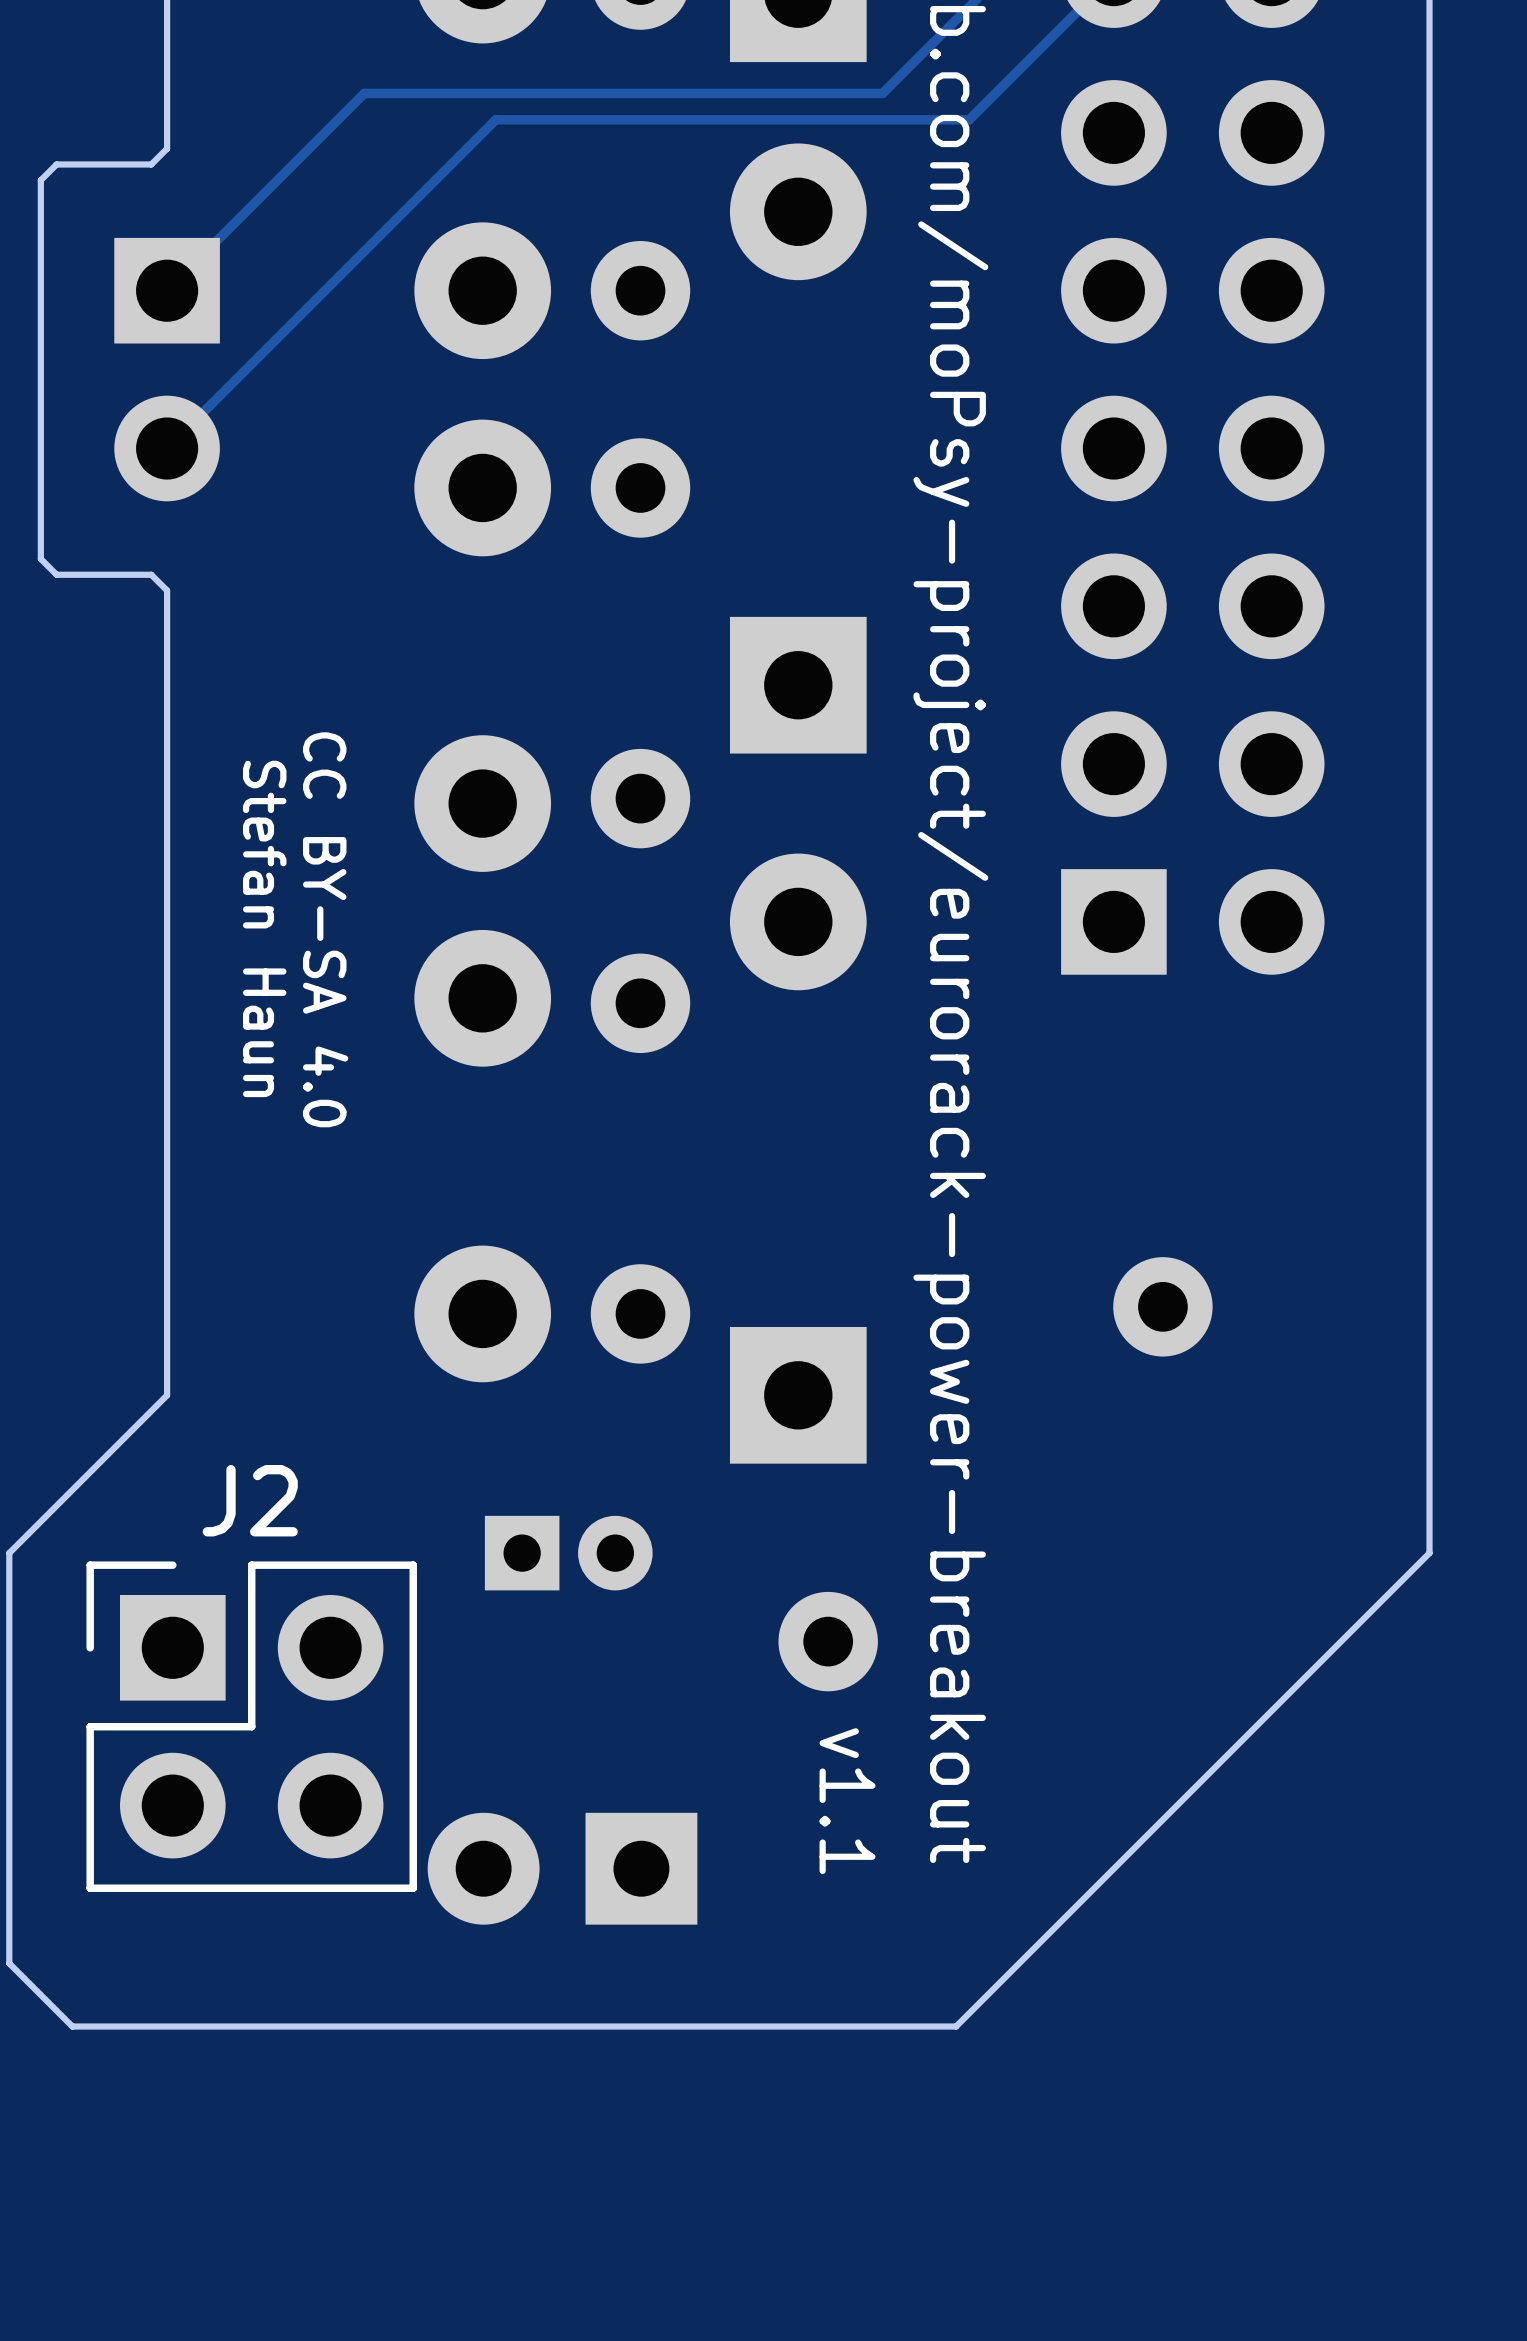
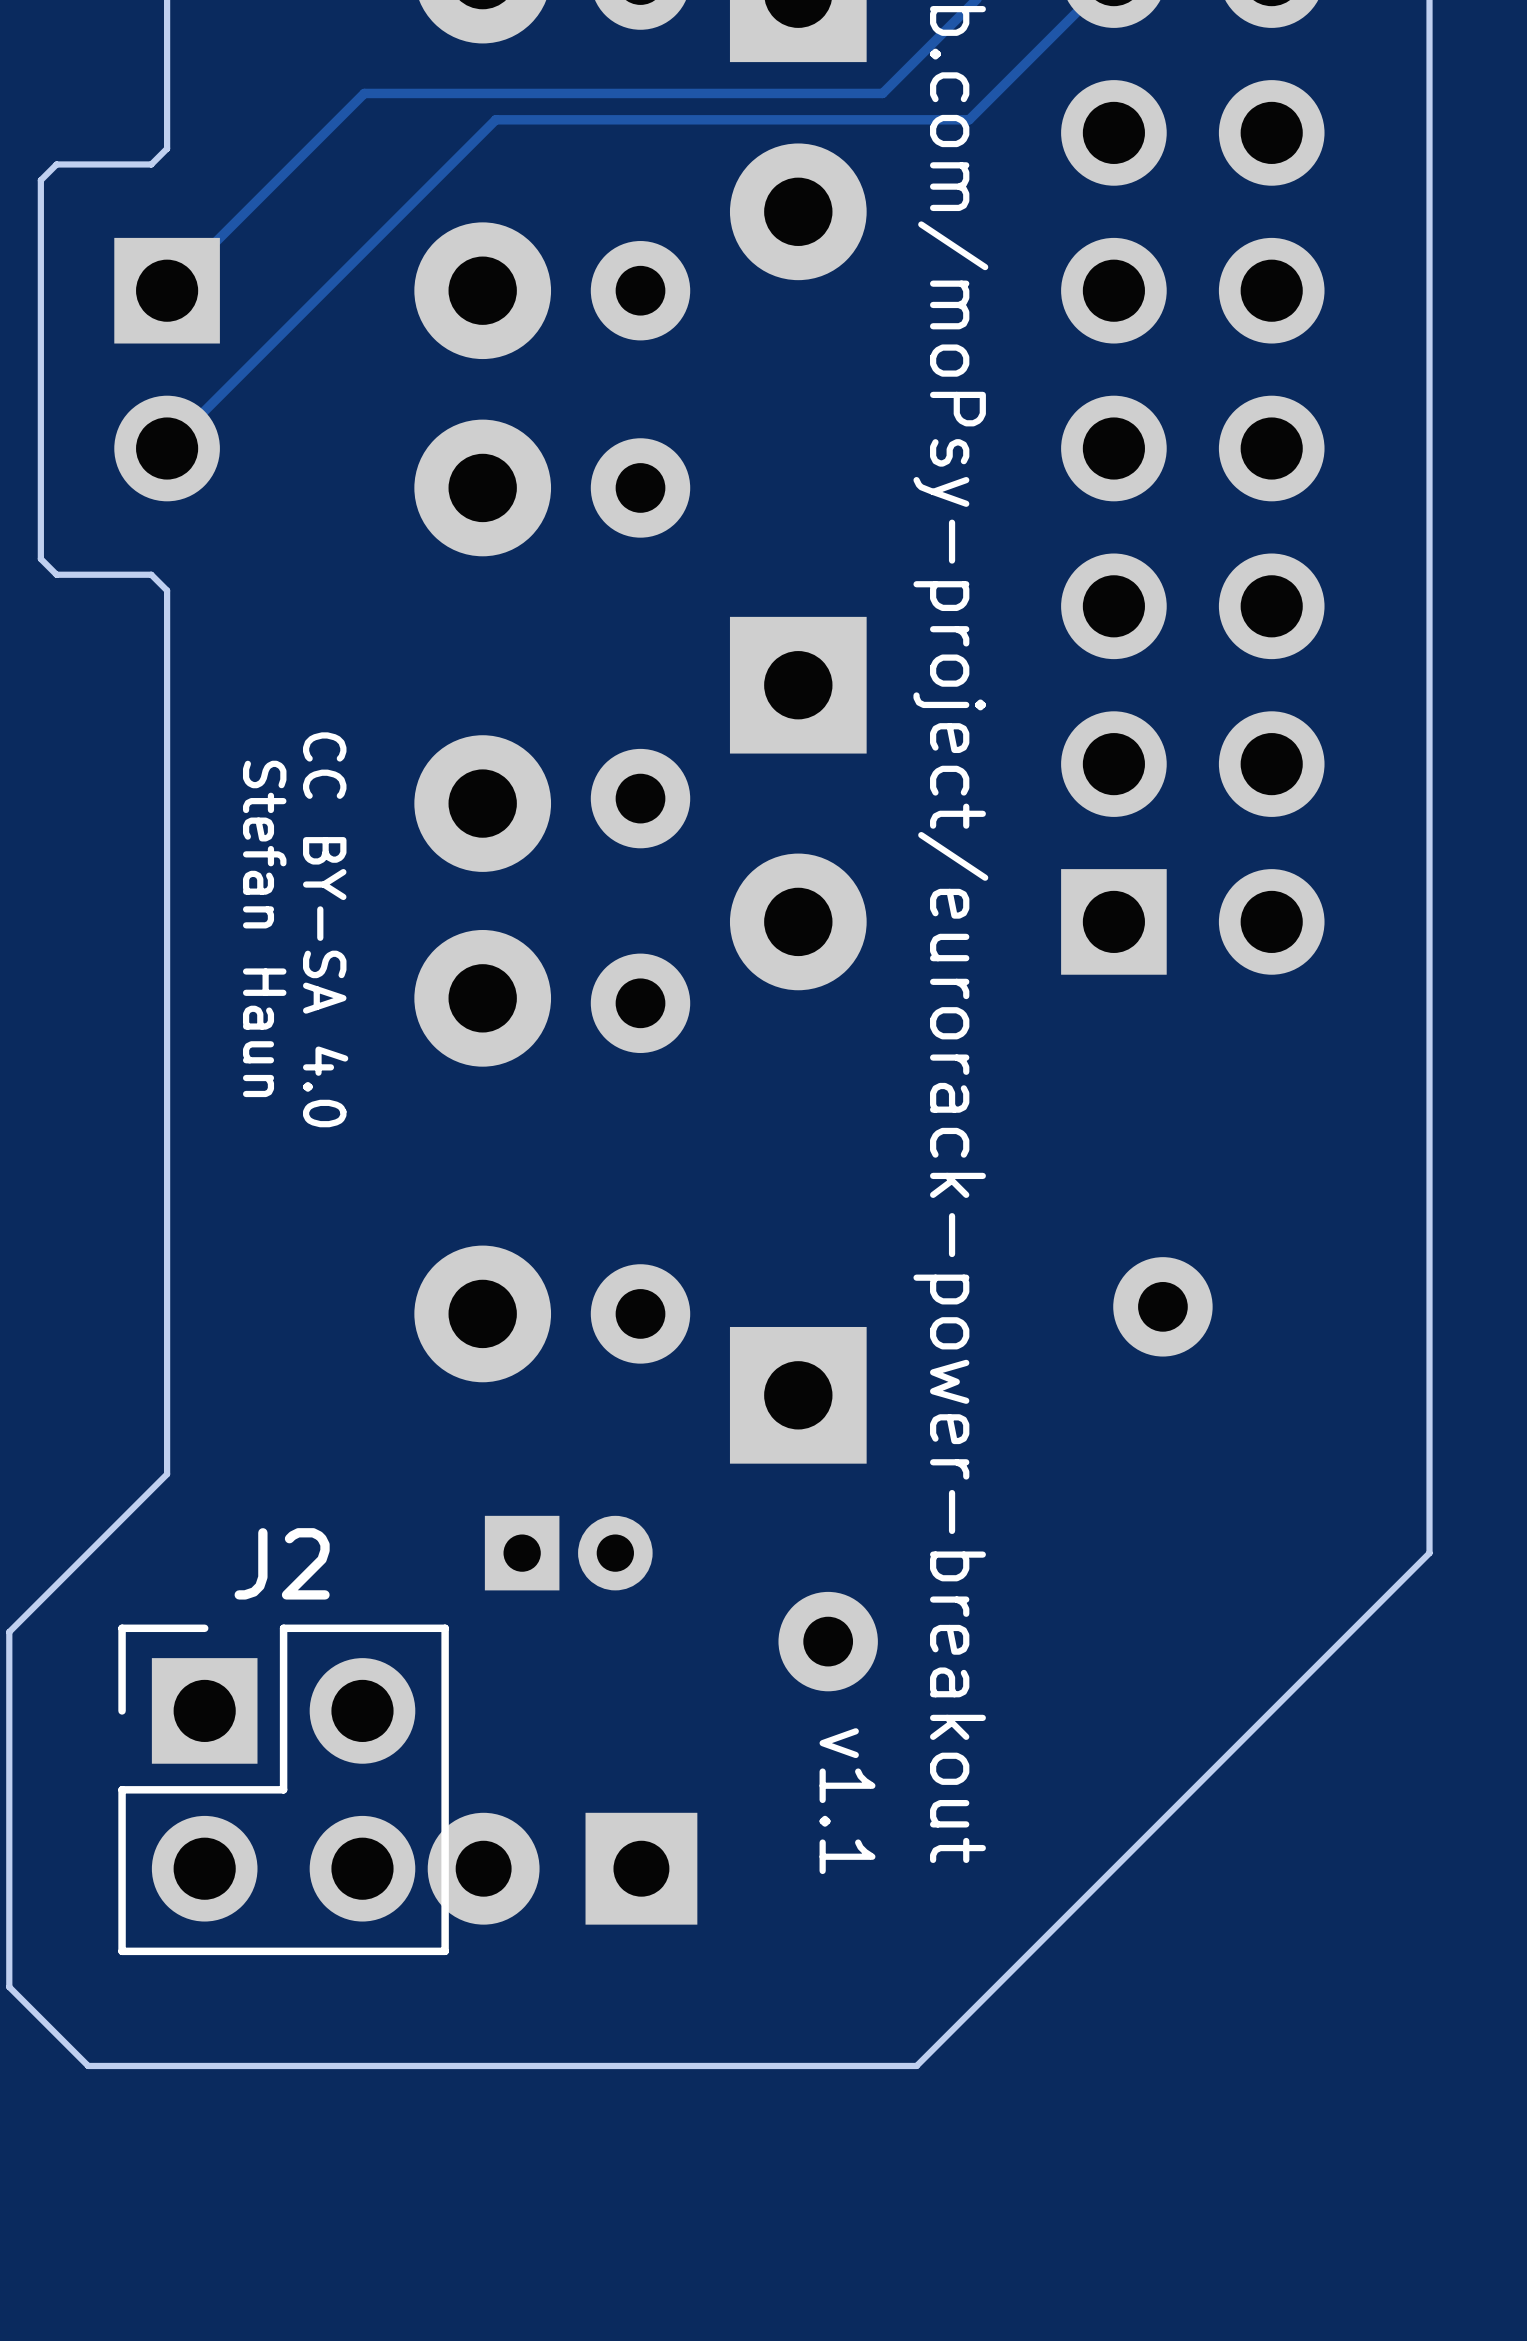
board edge: (167, 1395) (9, 1553) (9, 1632) -> (167, 1395) (167, 1474) (9, 1632)
J2 position: (251, 1726) -> (283, 1789)
board edge: (9, 1963) (72, 2026) (956, 2026) -> (9, 1963) (9, 1987) (88, 2065) (916, 2065) (956, 2026)

